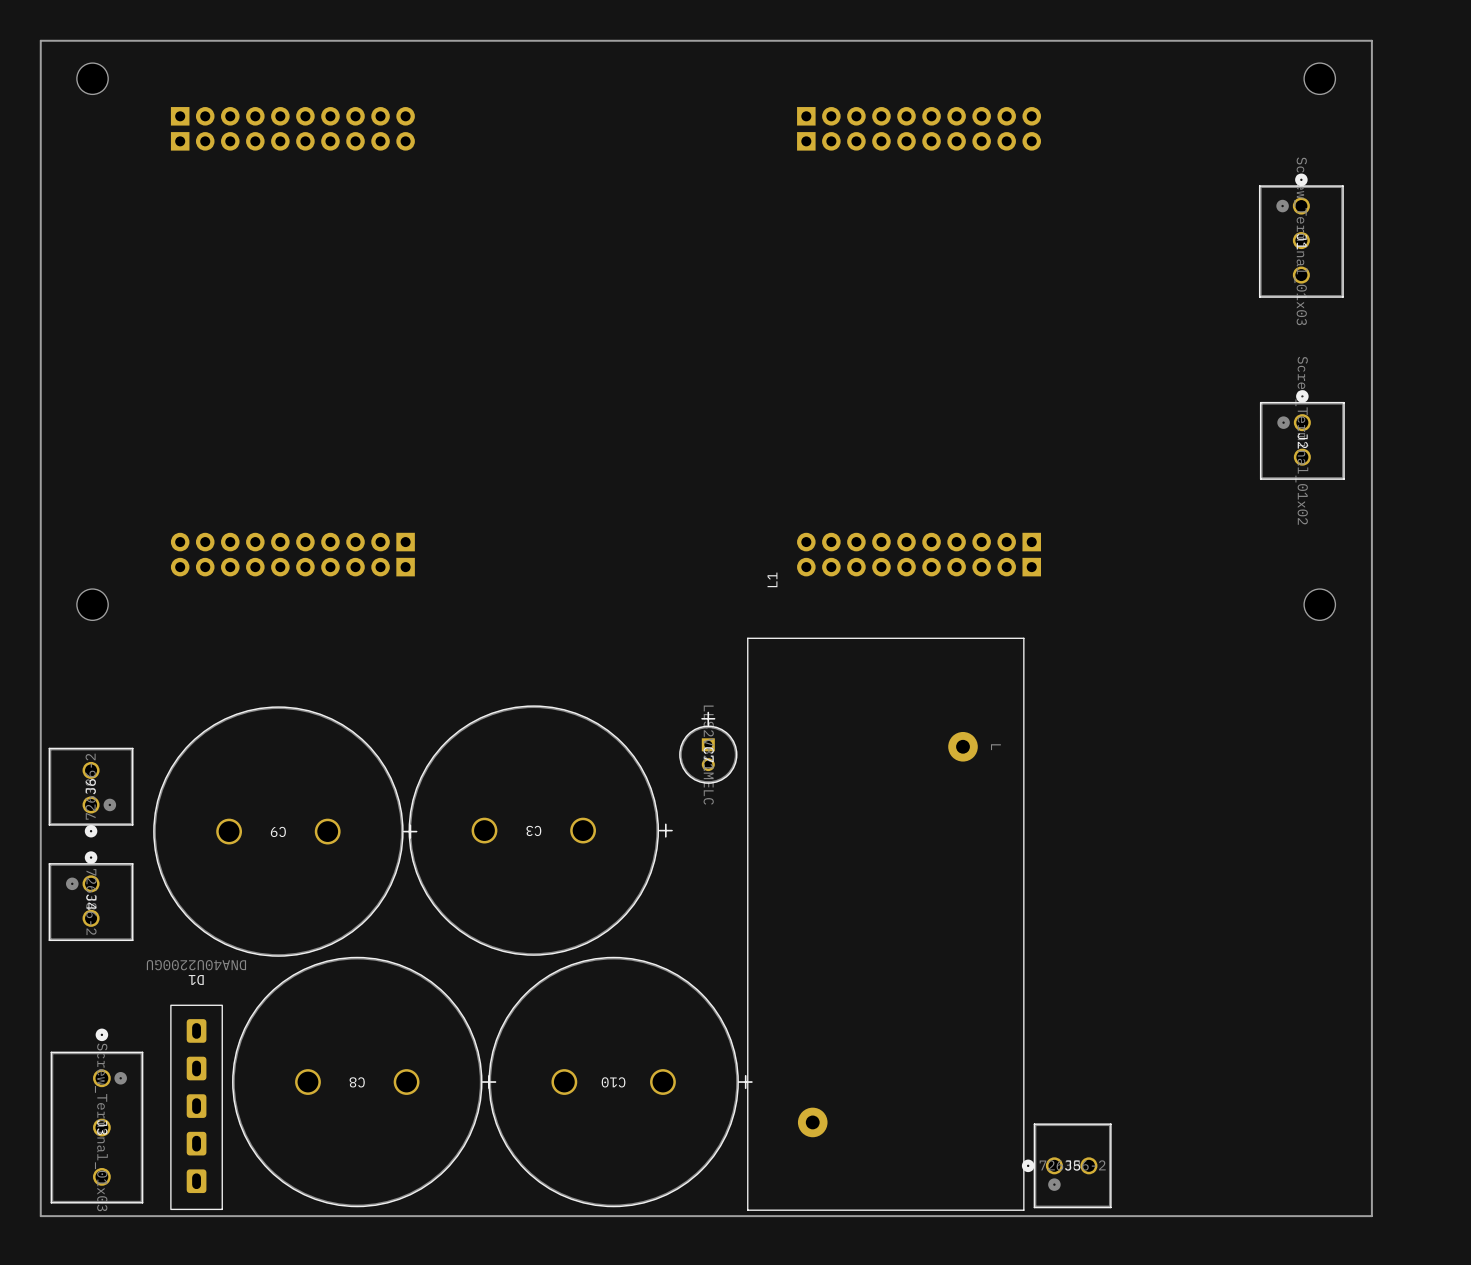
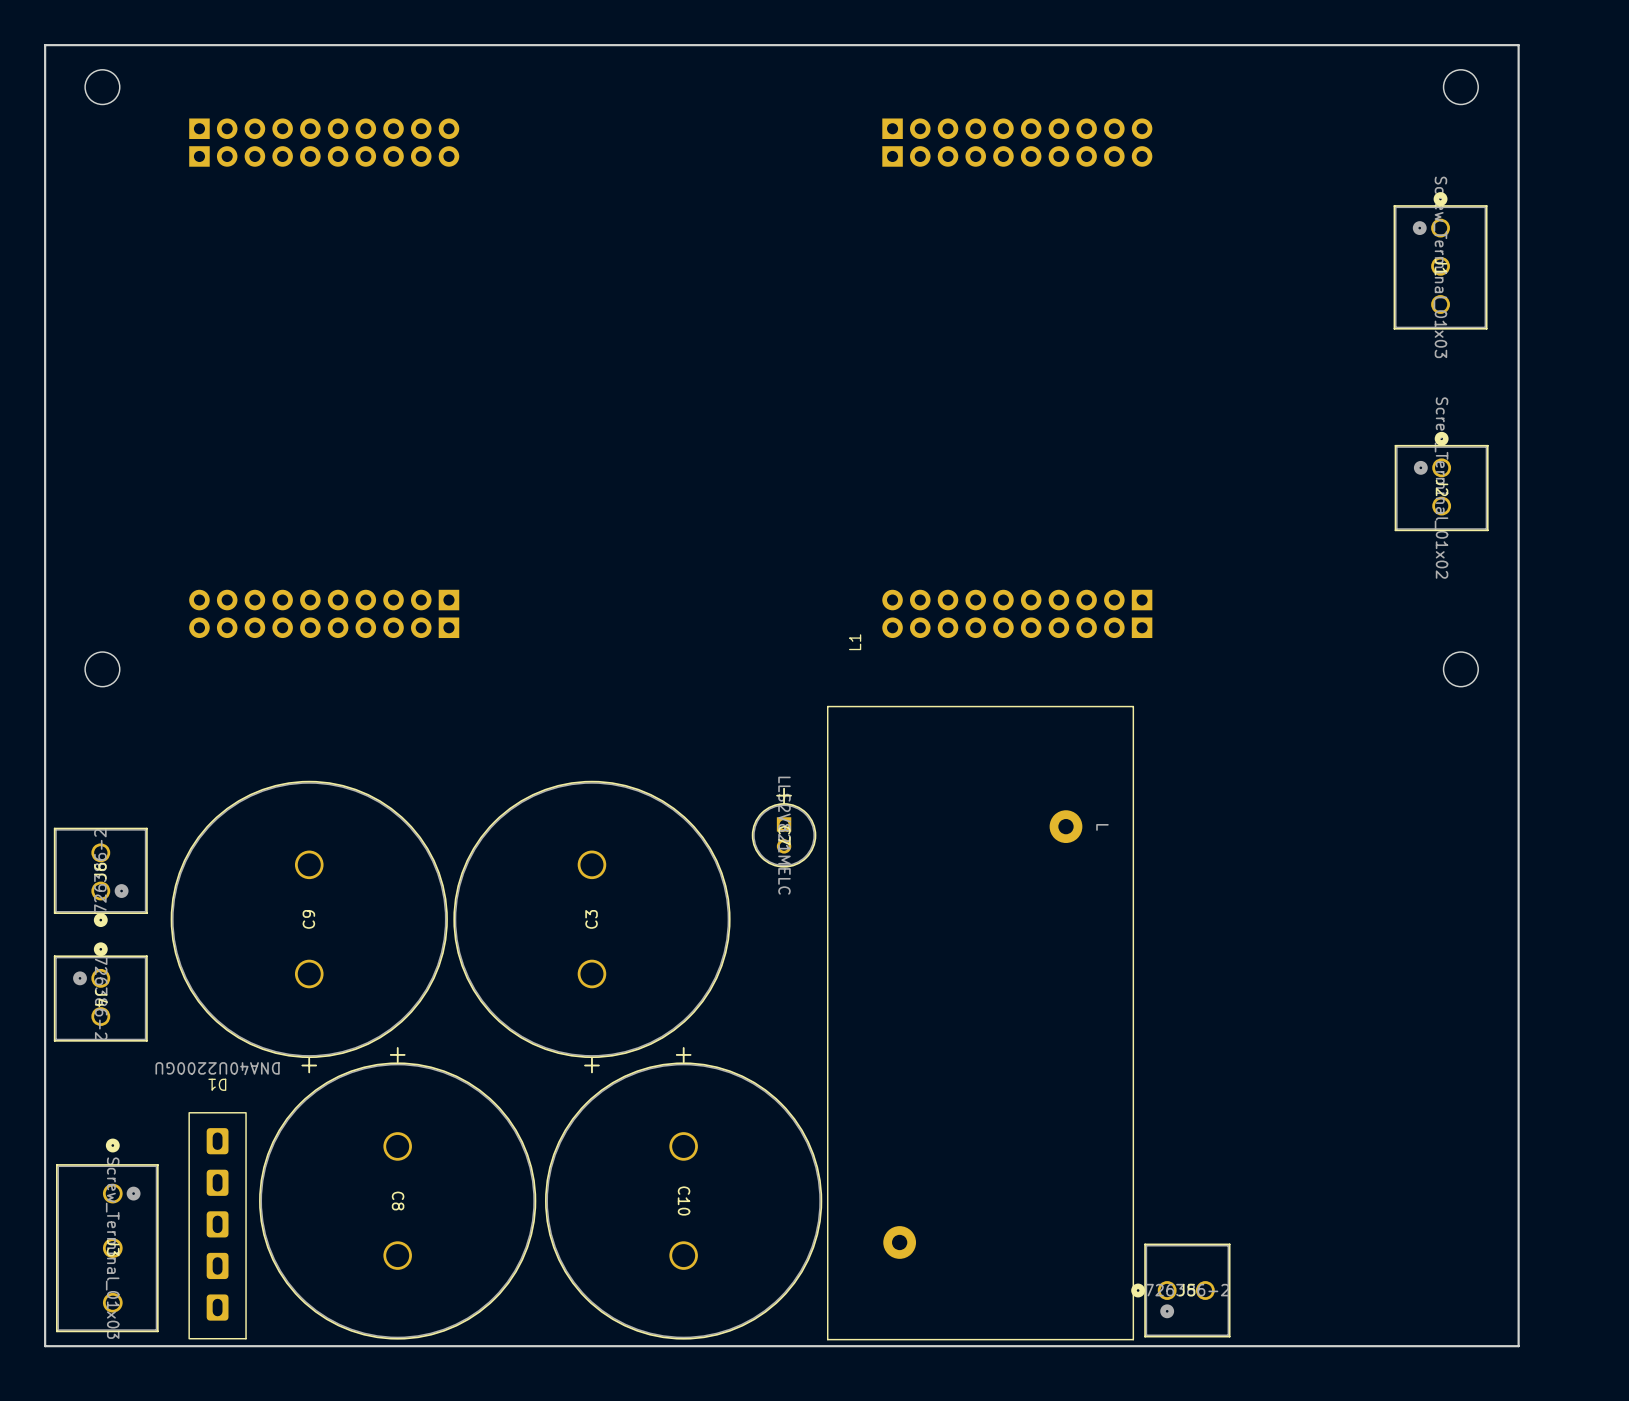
C3 rotation: 0° (540, 830) -> 90° clockwise (591, 927)
C9 rotation: 0° (285, 831) -> 90° clockwise (309, 927)
C8 rotation: 0° (364, 1082) -> 90° counterclockwise (397, 1193)
C10 rotation: 0° (620, 1082) -> 90° counterclockwise (683, 1193)

